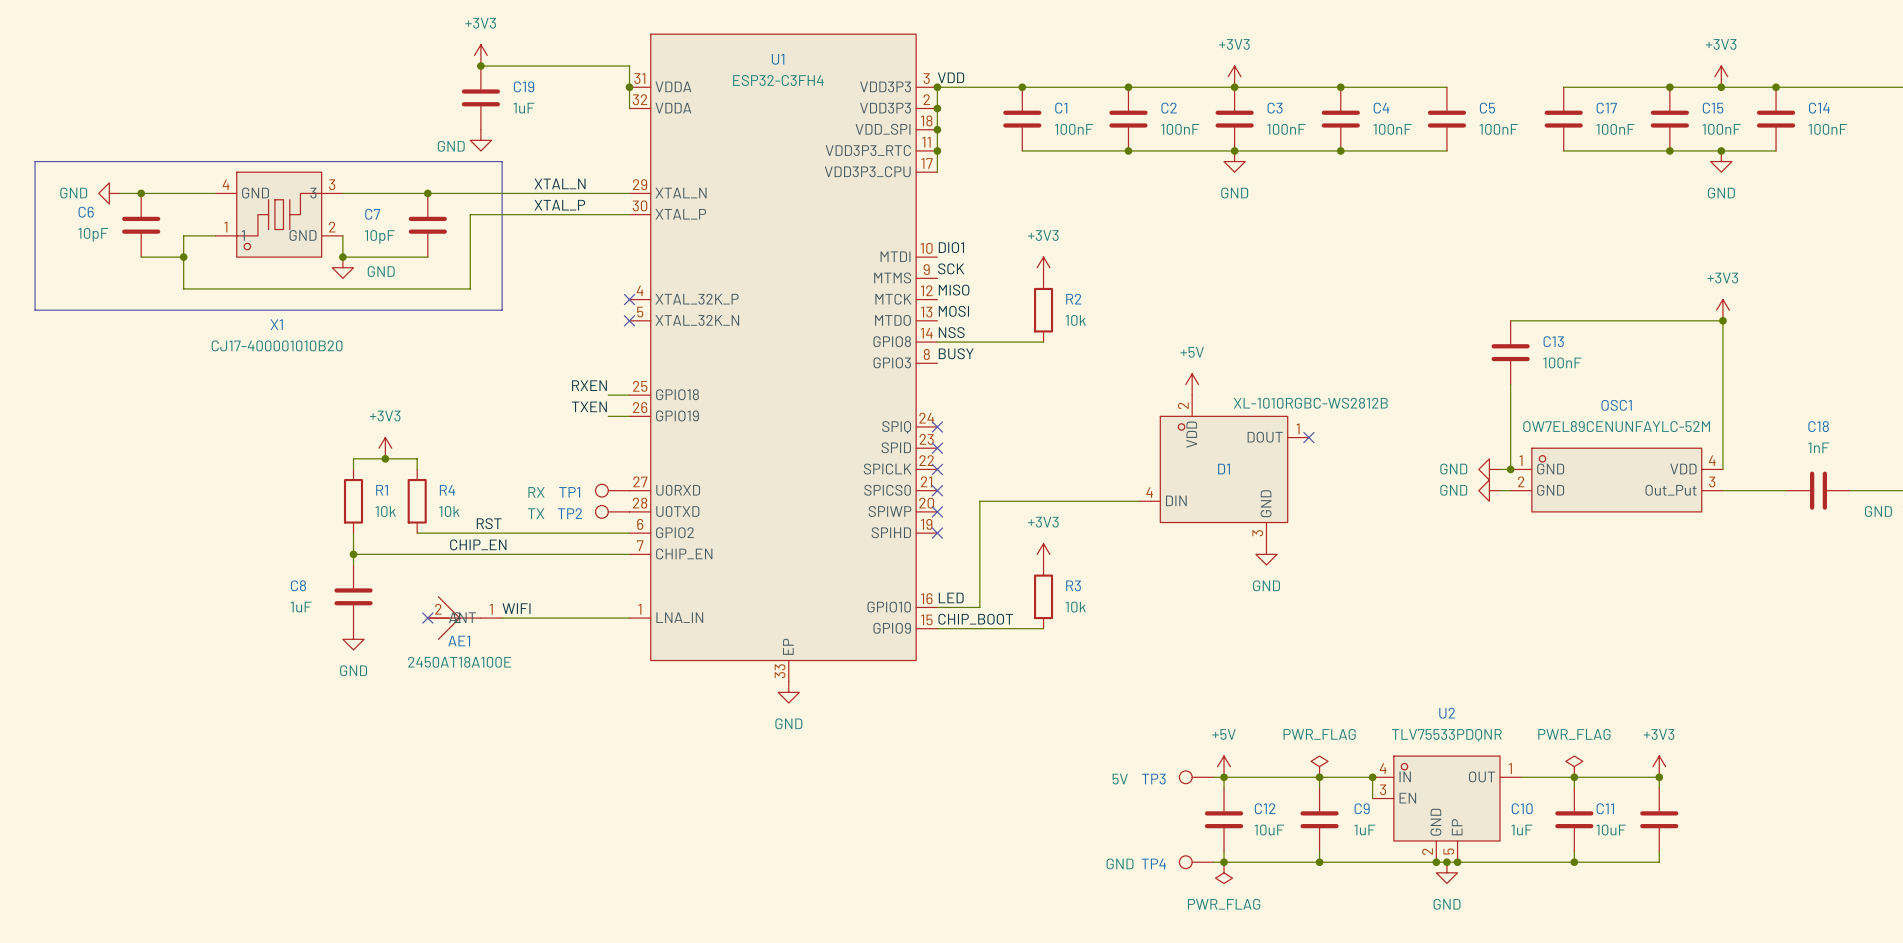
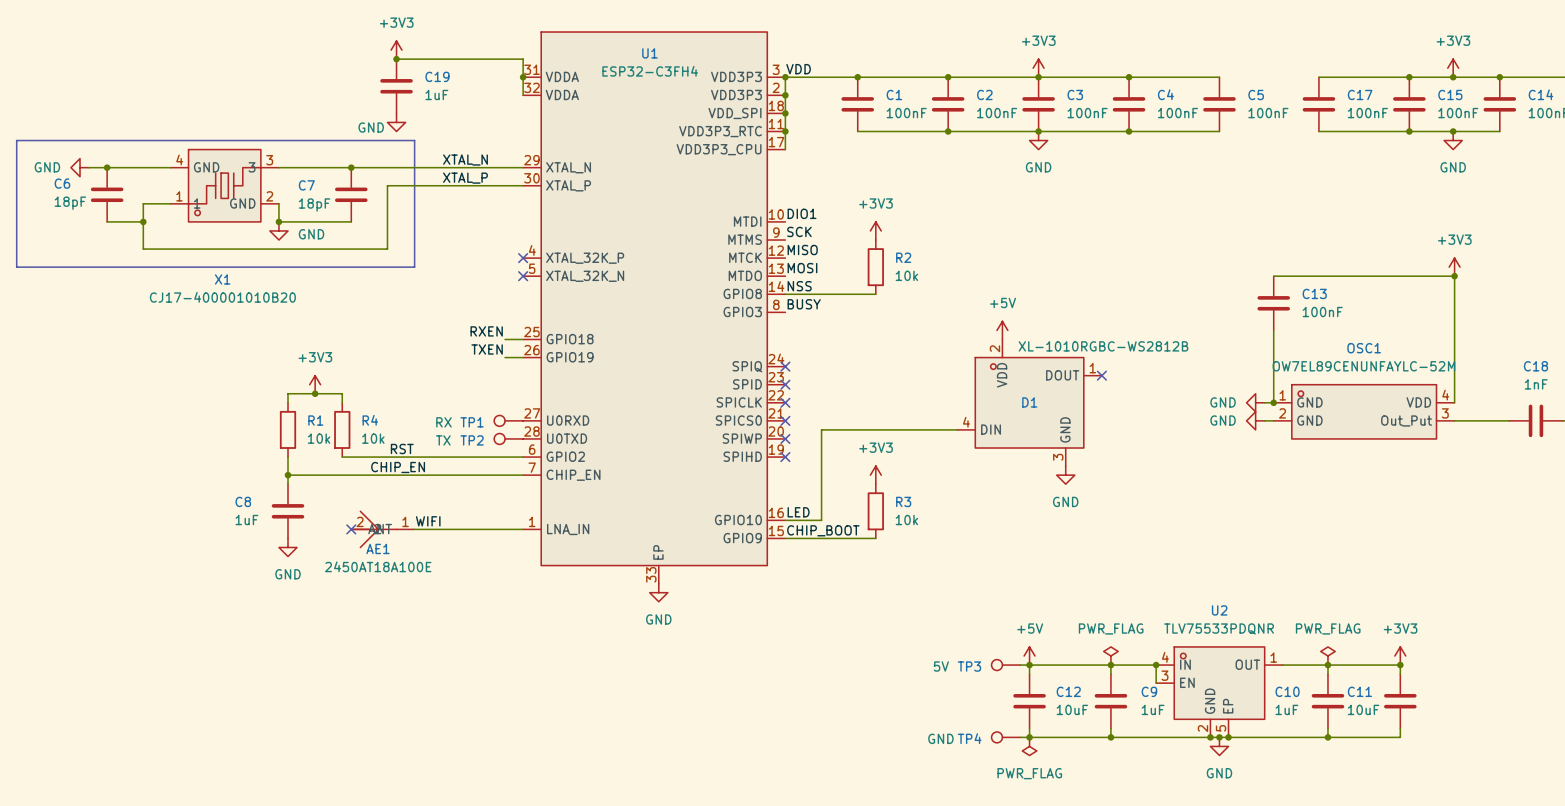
C6 value: 10pF (93, 234) -> 18pF (70, 203)
C7 value: 10pF (379, 236) -> 18pF (314, 205)

